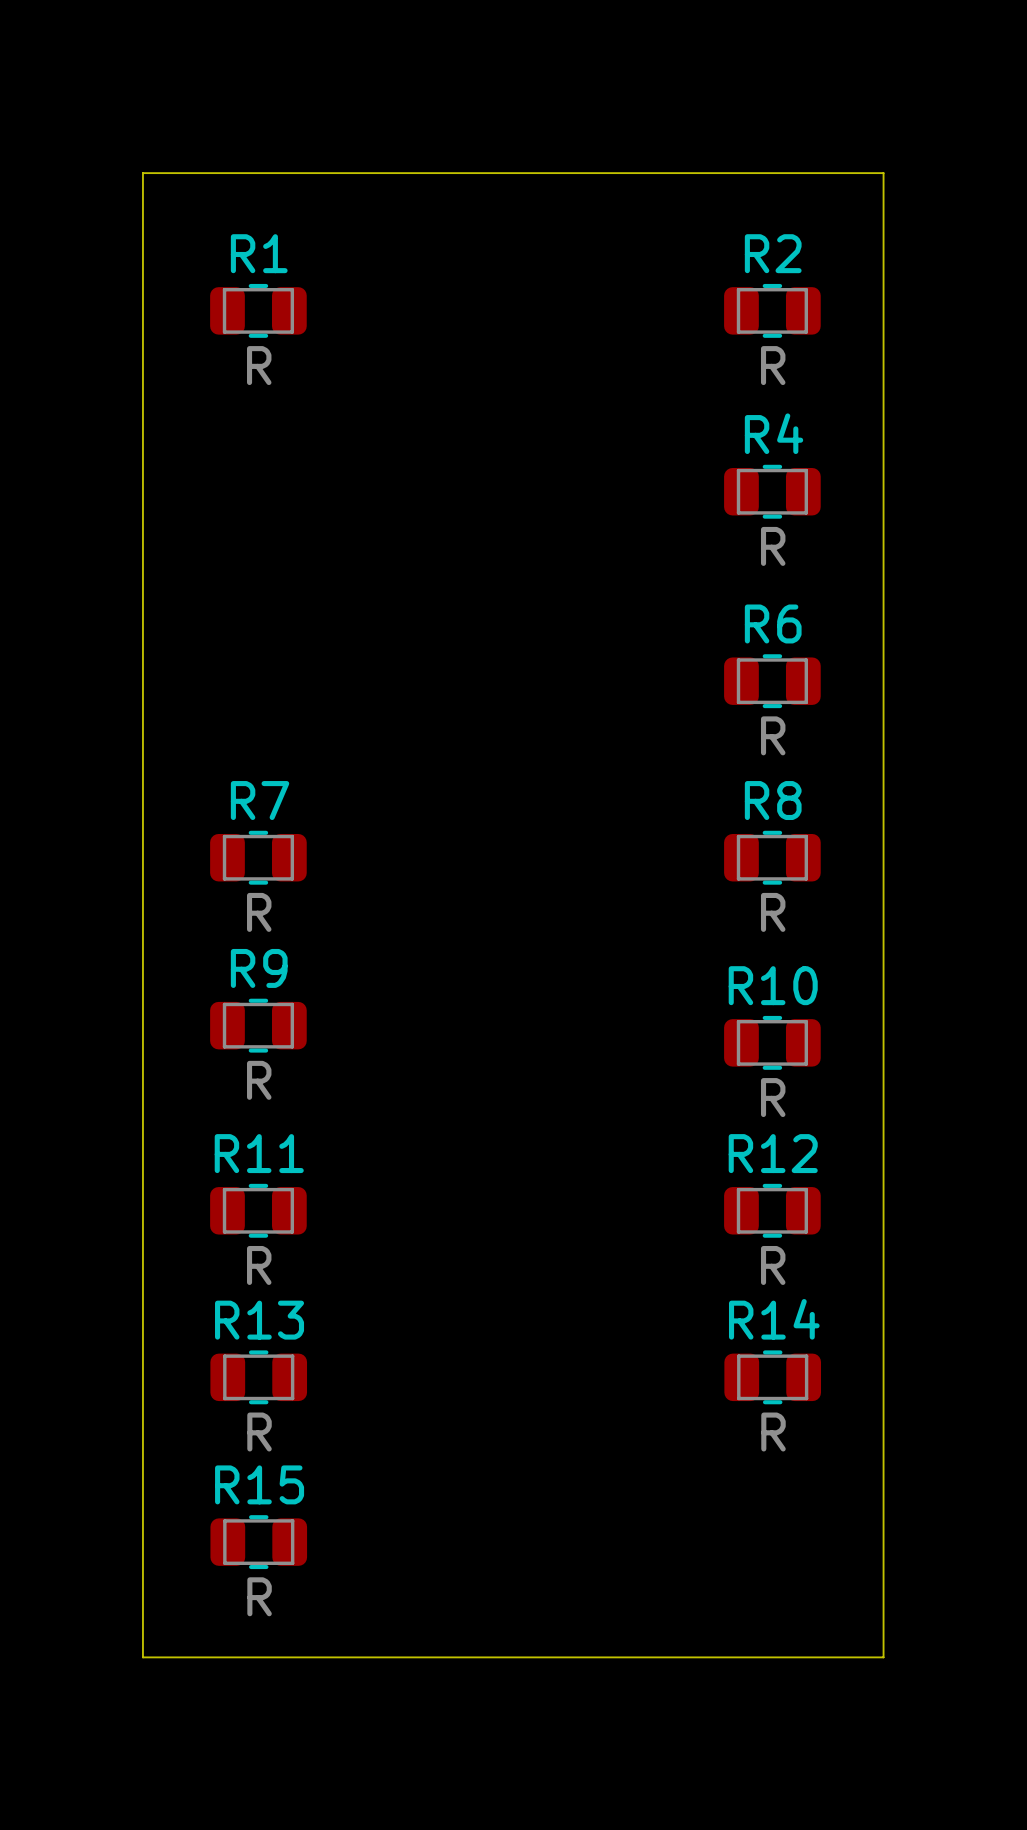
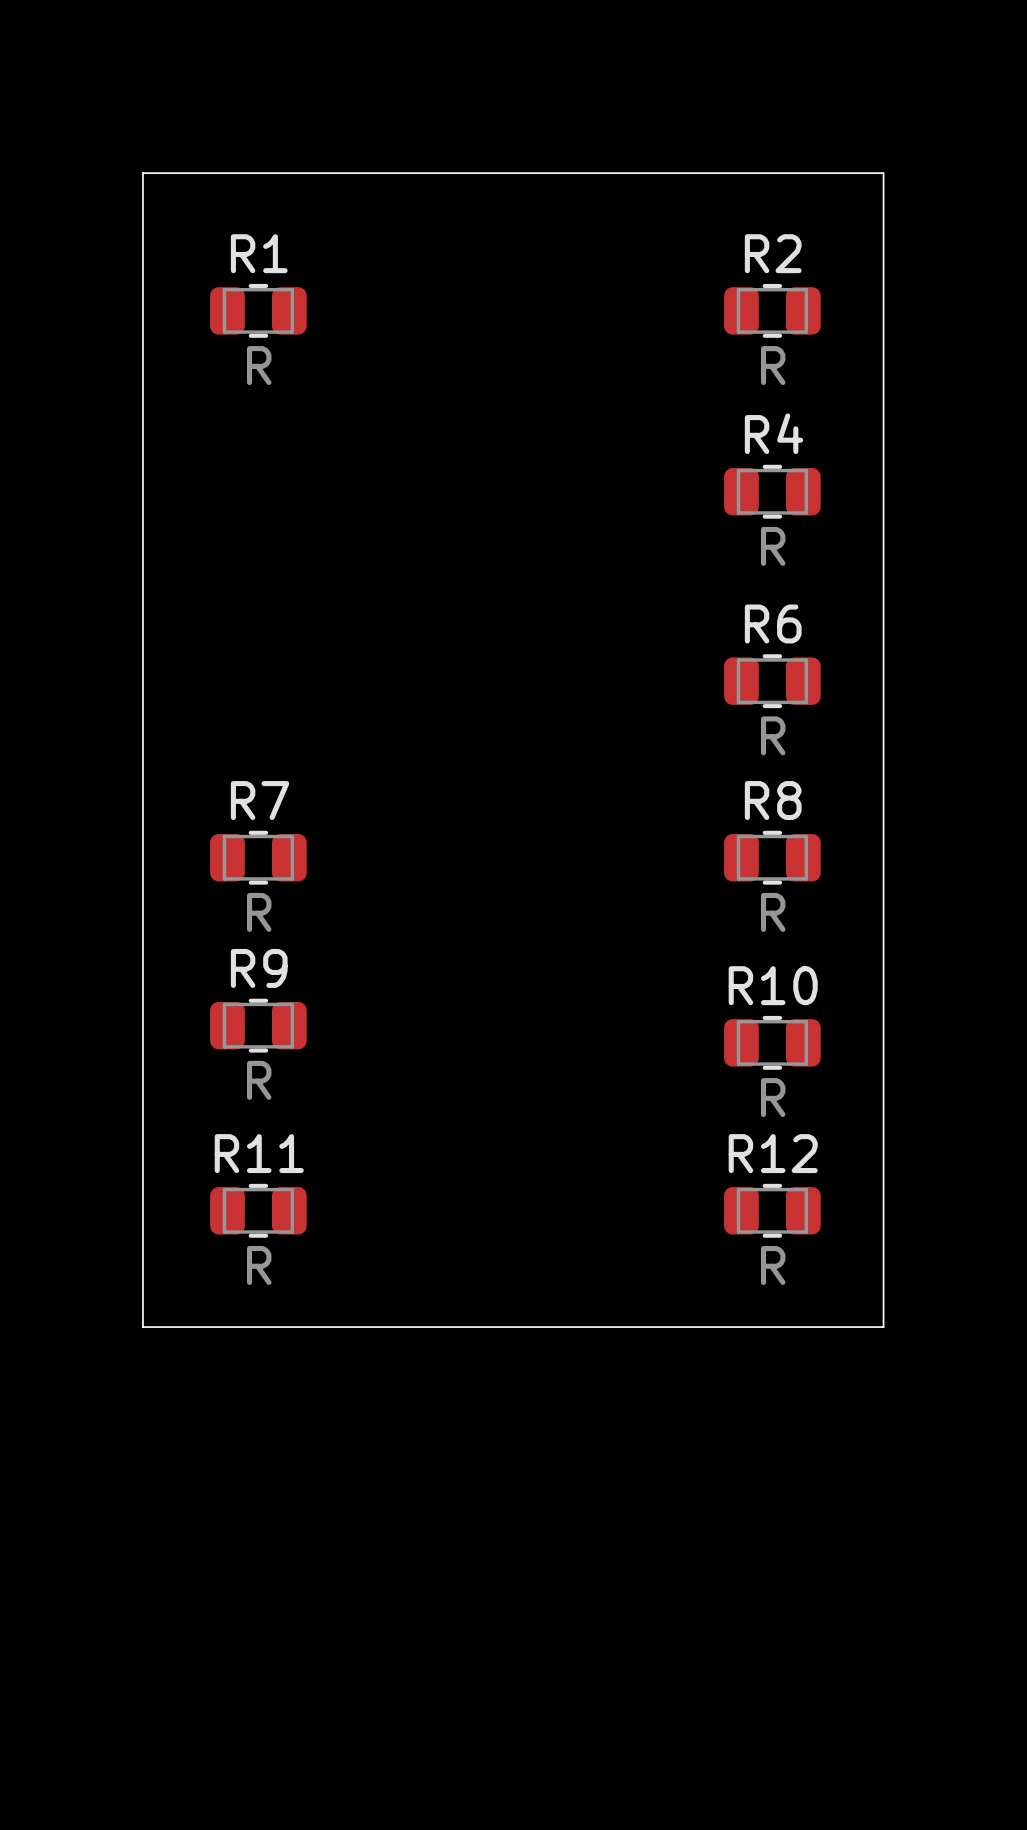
board edge: (142, 1327) (142, 1657) (883, 1657) (883, 1327) -> (142, 1327) (883, 1327)
R13: R (258, 1377) -> none
R14: R (772, 1377) -> none
R15: R (258, 1542) -> none

